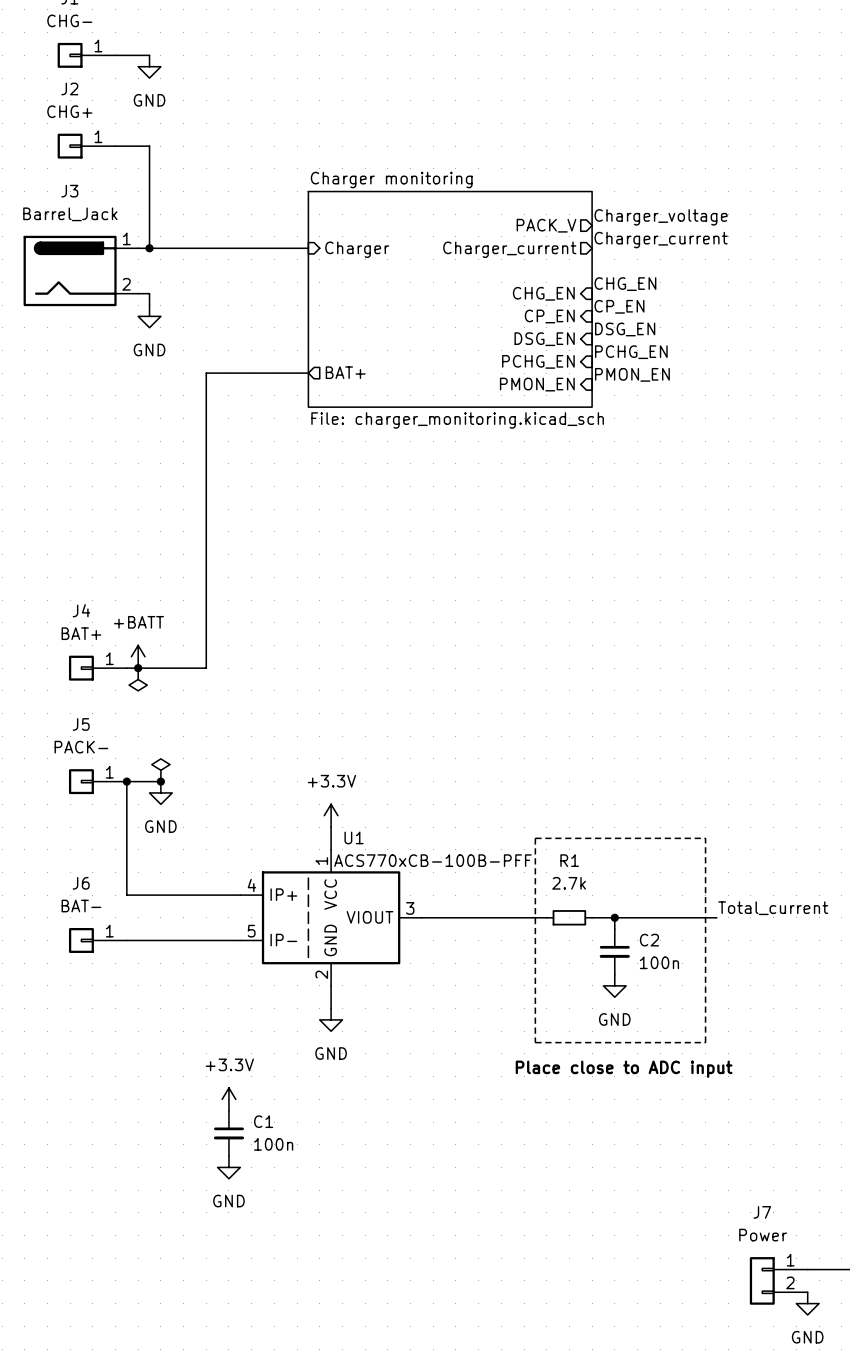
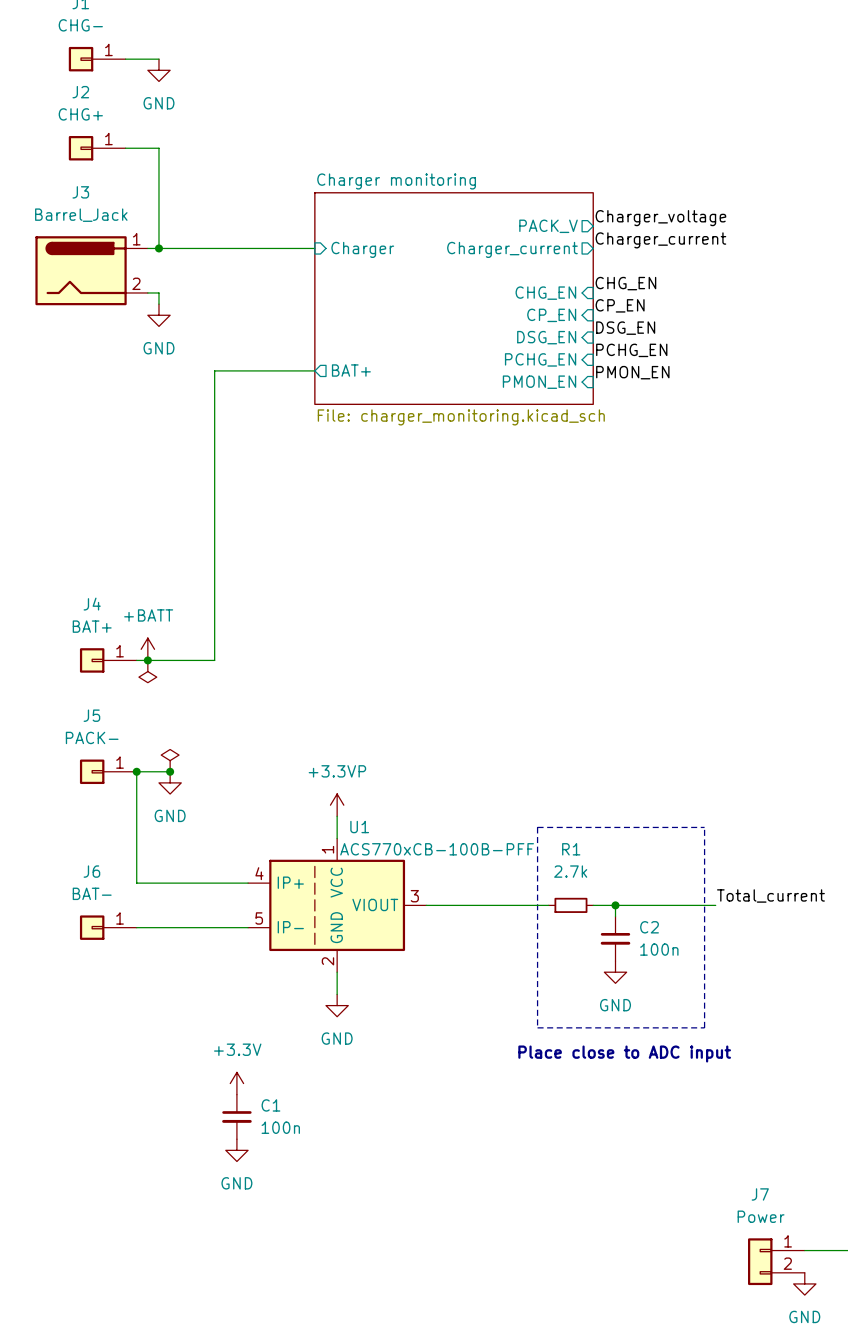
power symbol: +3.3V (331, 815) -> +3.3VP (337, 805)

